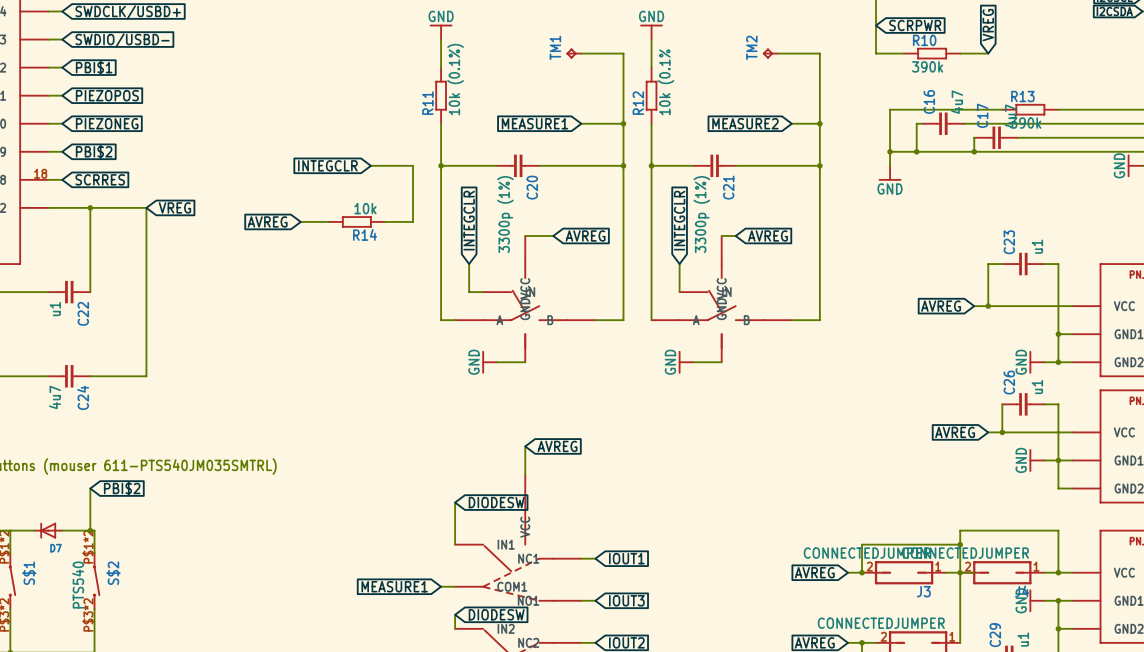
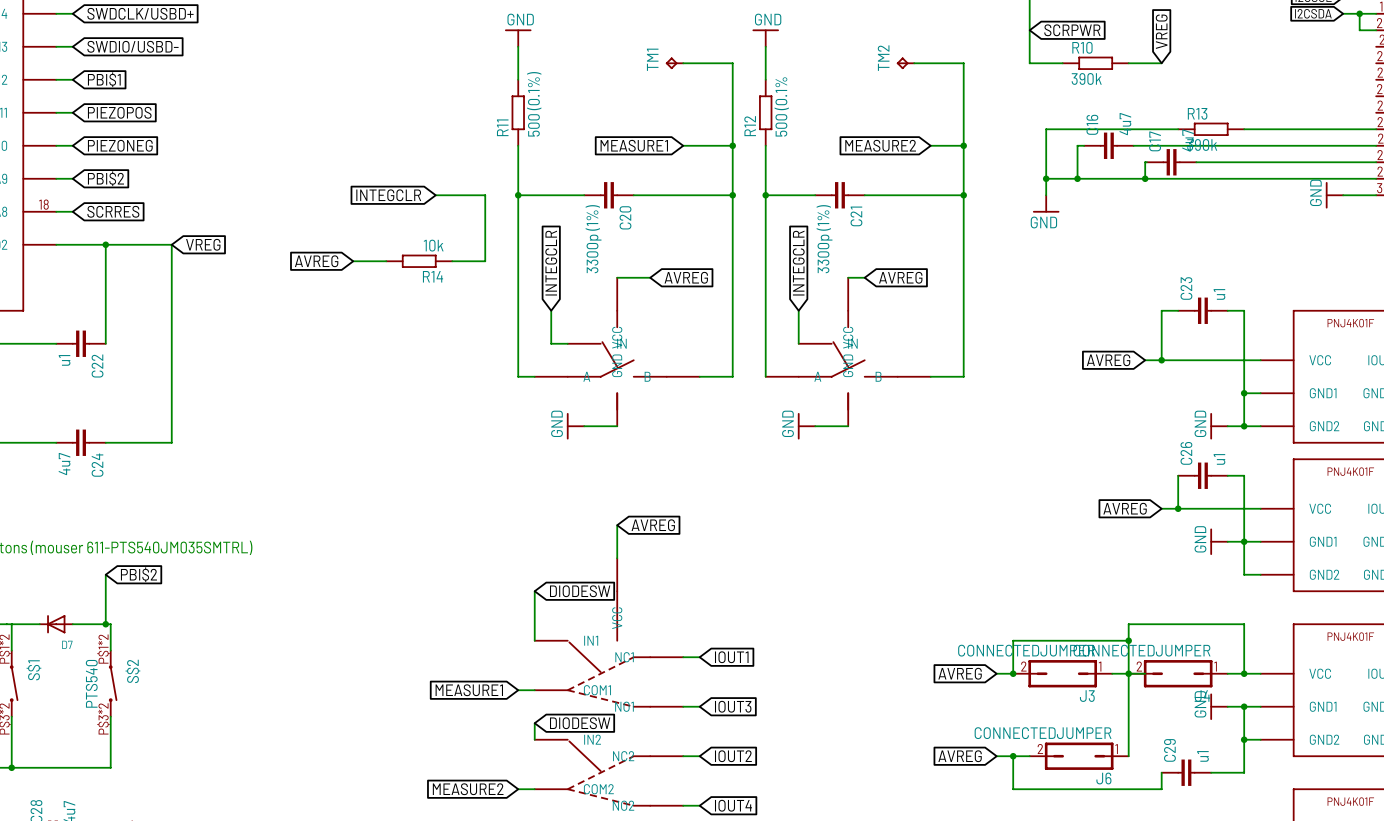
R11 value: 10k (0.1%) (455, 79) -> 500 (0.1%) (534, 104)
R12 value: 10k (0.1% (666, 82) -> 500 (0.1% (781, 106)

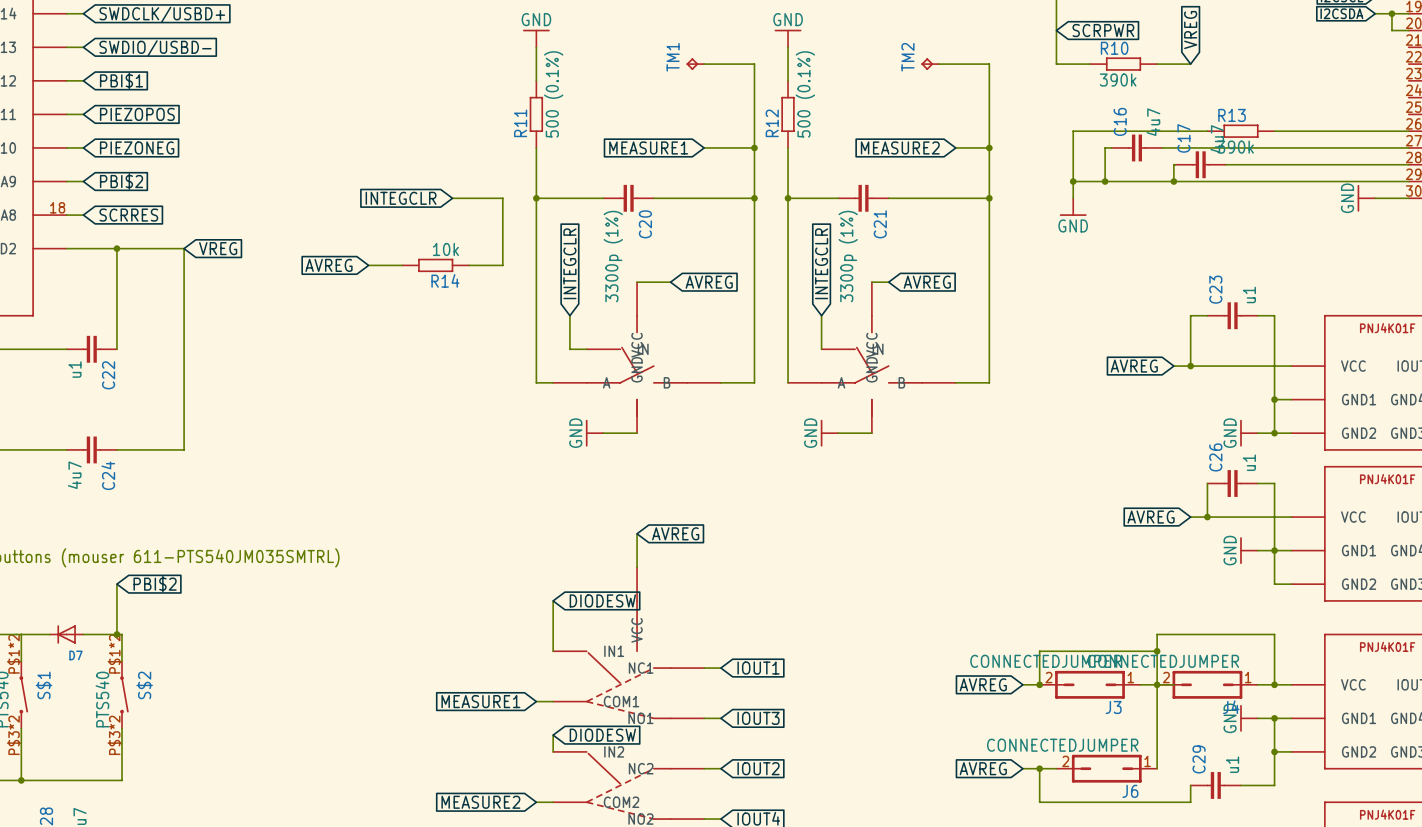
R12 value: 500 (0.1% (781, 106) -> 500 (0.1%) (805, 94)

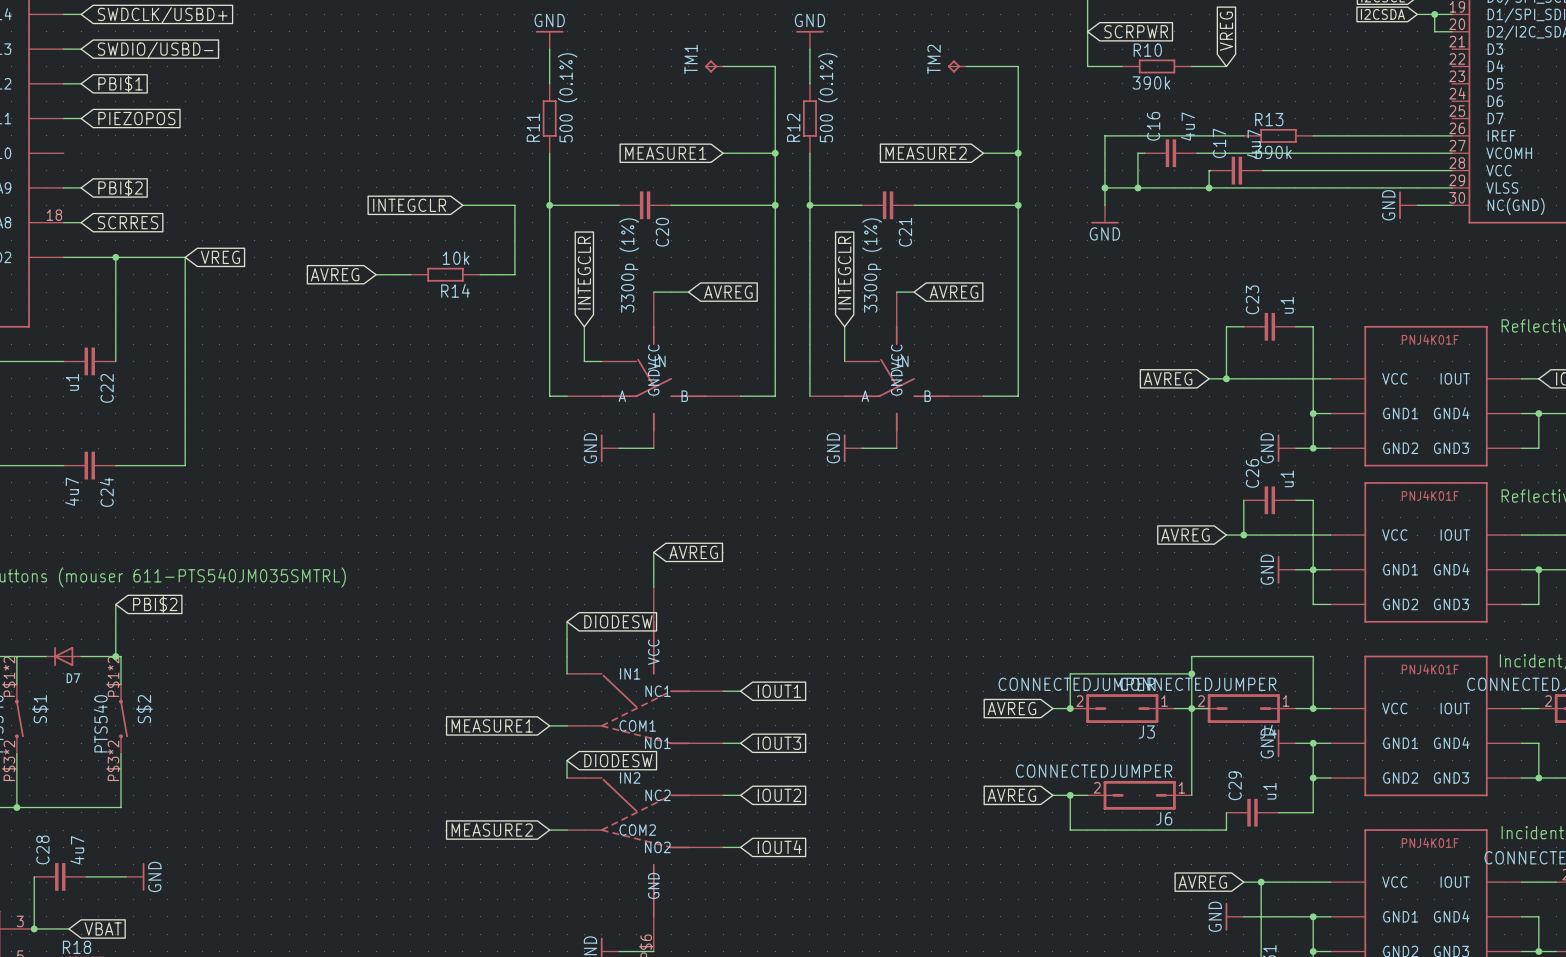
wire: (66, 147) (83, 147) -> none
global label: PIEZONEG (137, 147) -> none

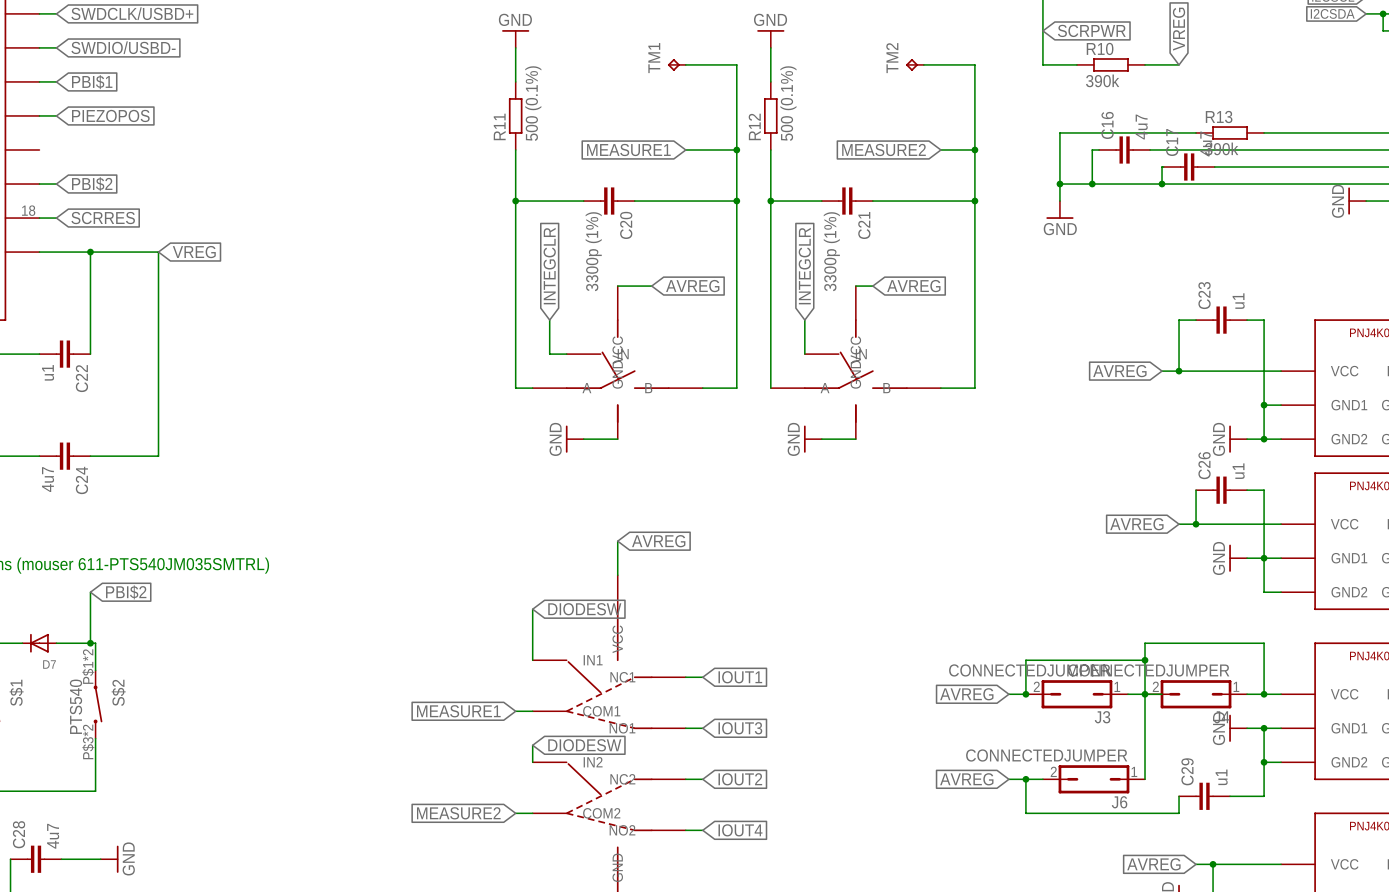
global label: INTEGCLR (409, 205) -> none
wire: (462, 205) (514, 205) (514, 274) (480, 274) -> none
global label: AVREG (335, 274) -> none
wire: (376, 274) (410, 274) -> none
R14: 10k (445, 274) -> none

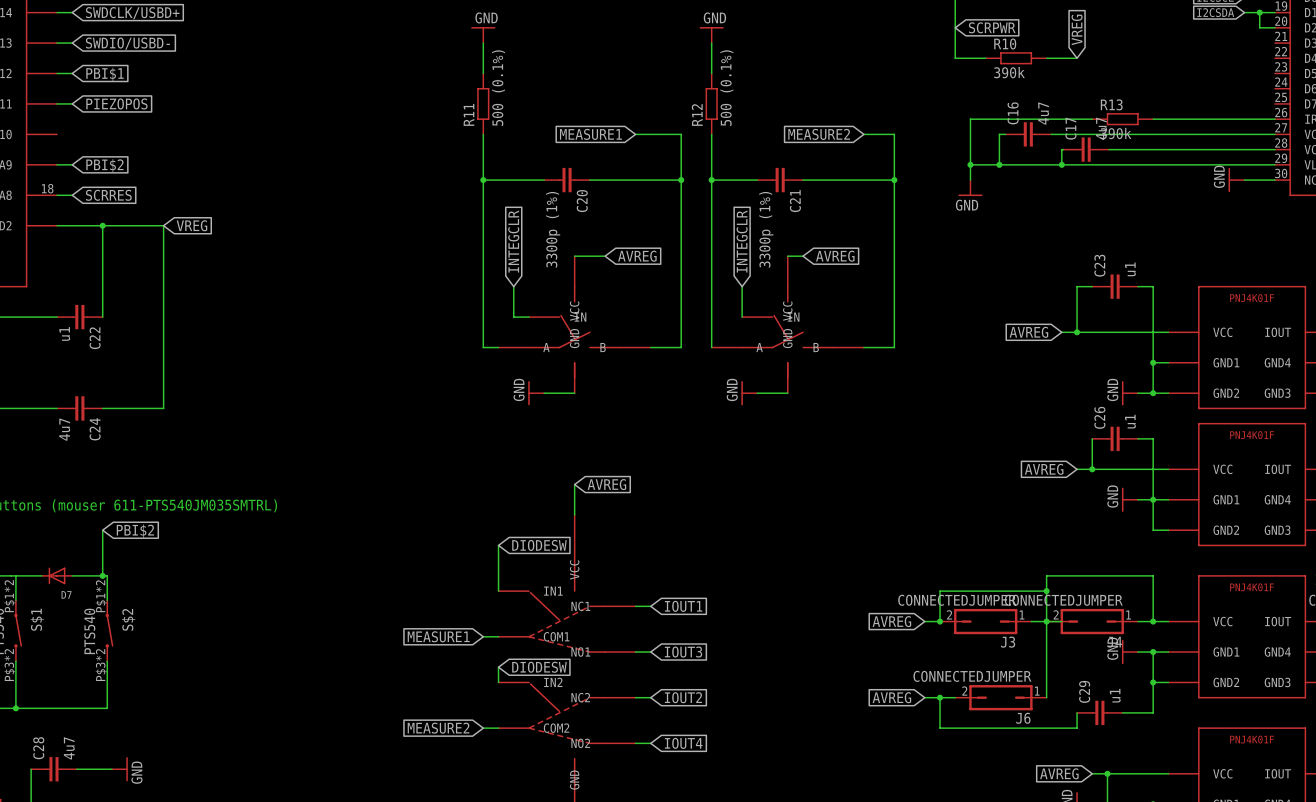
TM1: (676, 64) -> none
wire: (685, 64) (736, 64) (736, 149) -> none
TM2: (914, 64) -> none
wire: (923, 64) (974, 64) (974, 149) -> none
junction: (736, 149) -> none
junction: (974, 149) -> none

